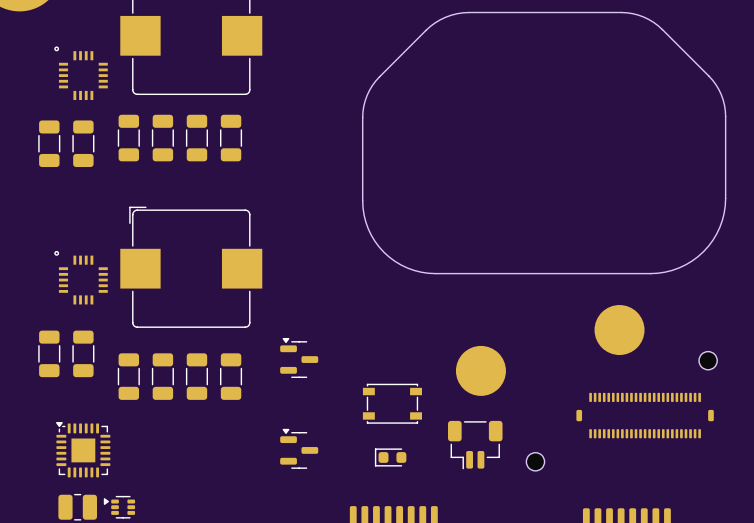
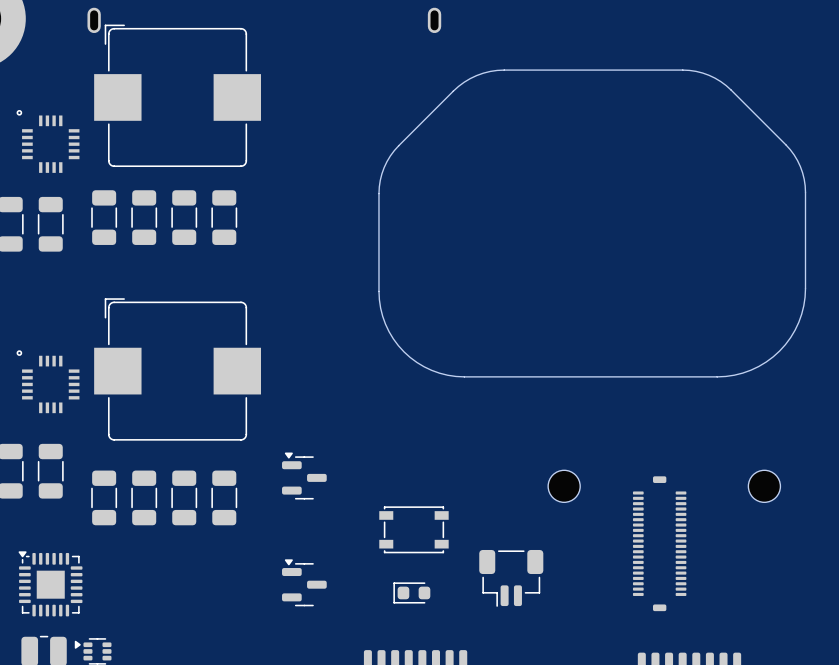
part: (619, 330) -> none
part: (708, 360) -> none
part: none -> (564, 486)
part: none -> (764, 486)
part: (480, 370) -> none
part: none -> (659, 543)
part: (645, 415) -> none
part: (535, 461) -> none

